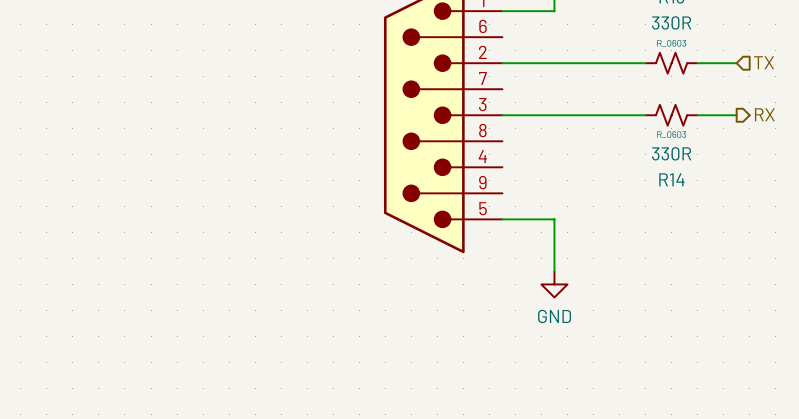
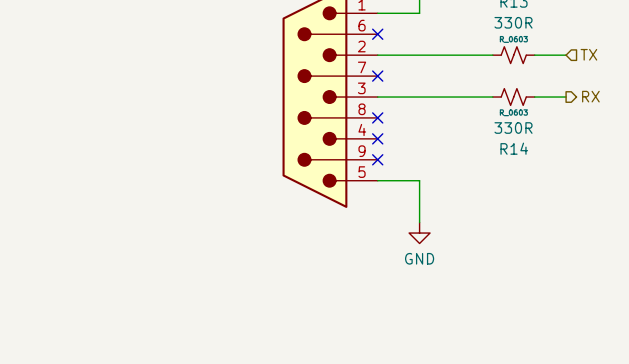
no-connect mark: none -> (377, 34)
no-connect mark: none -> (377, 76)
no-connect mark: none -> (377, 117)
no-connect mark: none -> (377, 138)
no-connect mark: none -> (377, 159)

